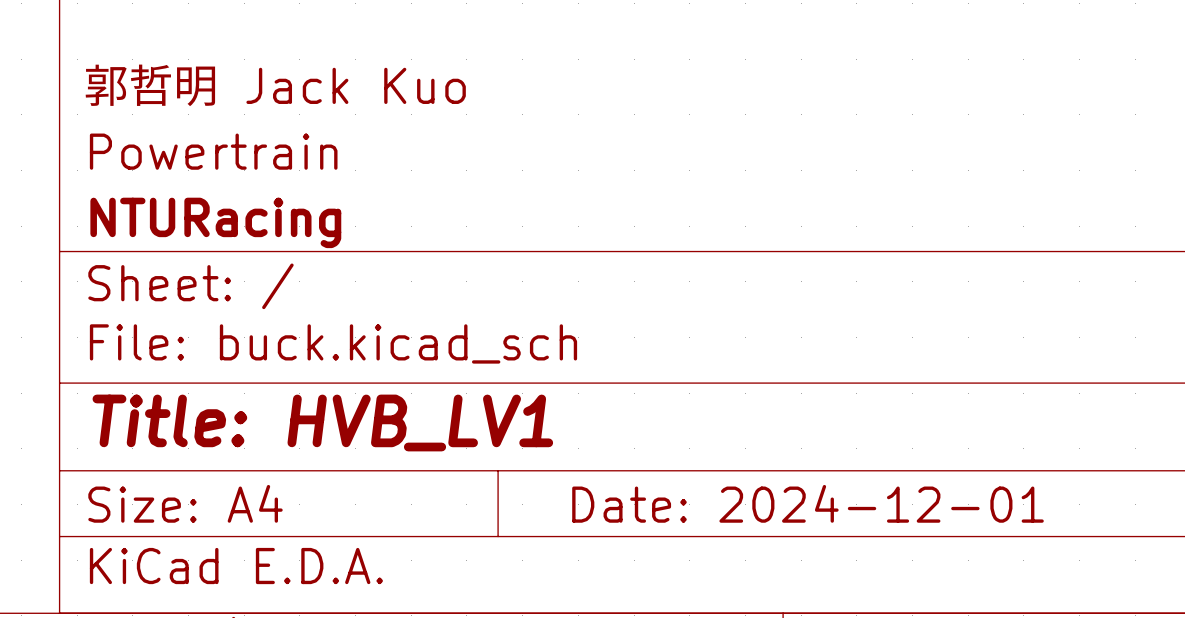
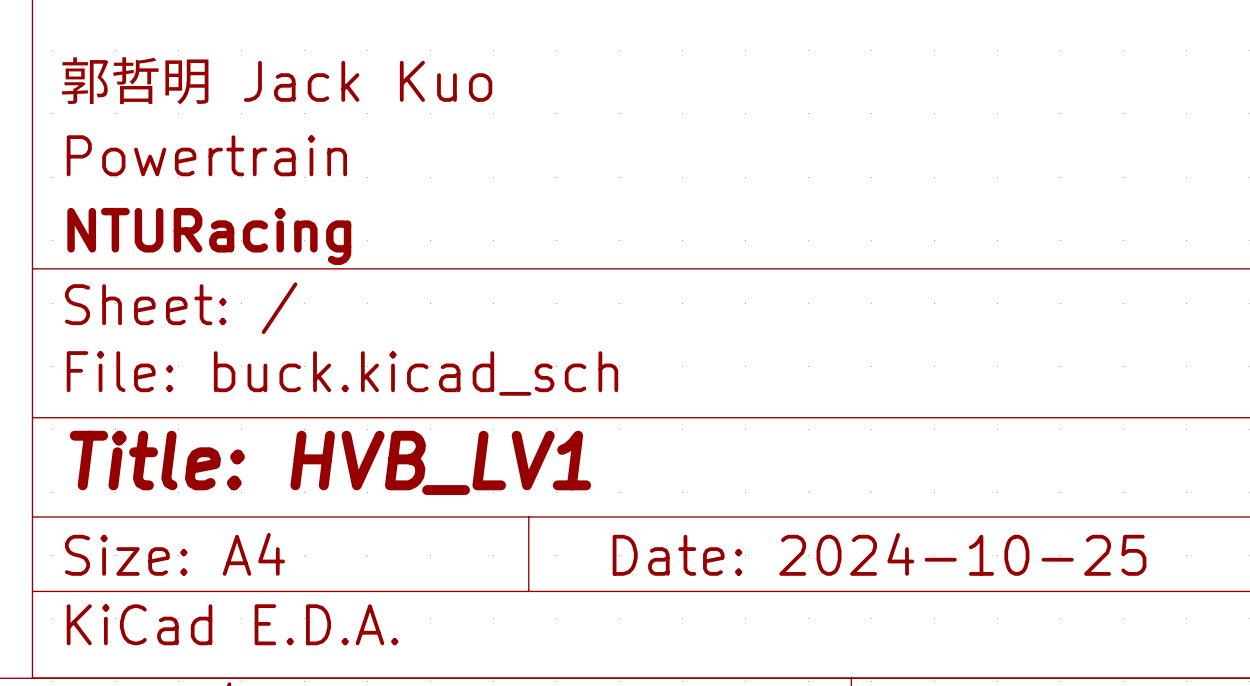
title block: Date: 2024-12-01 (807, 503) -> Date: 2024-10-25 (879, 554)

